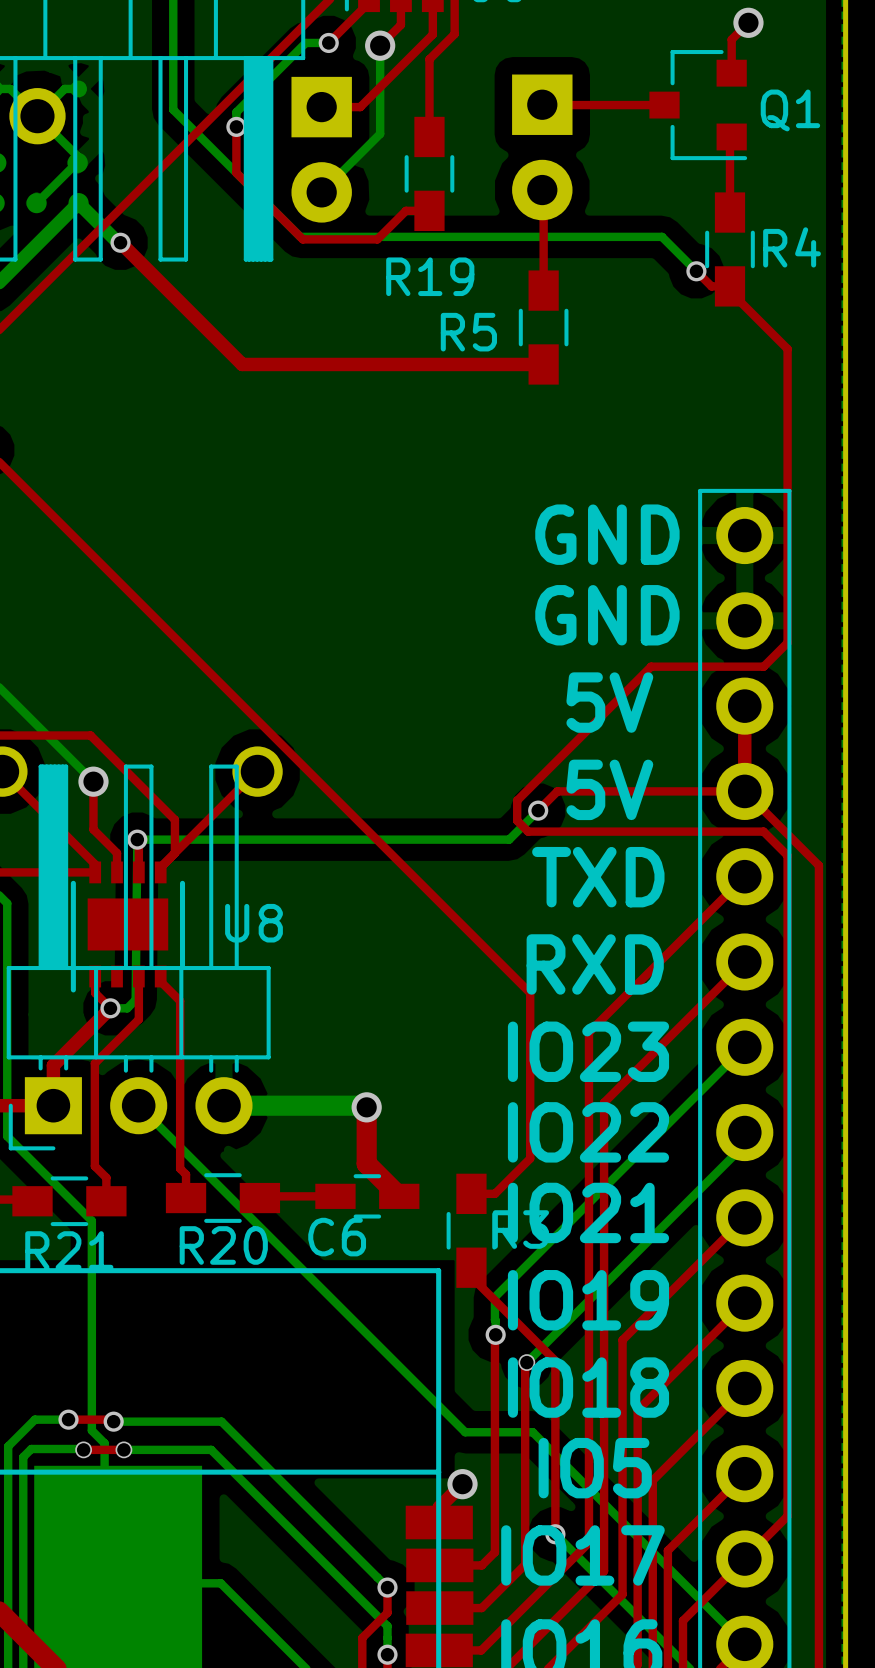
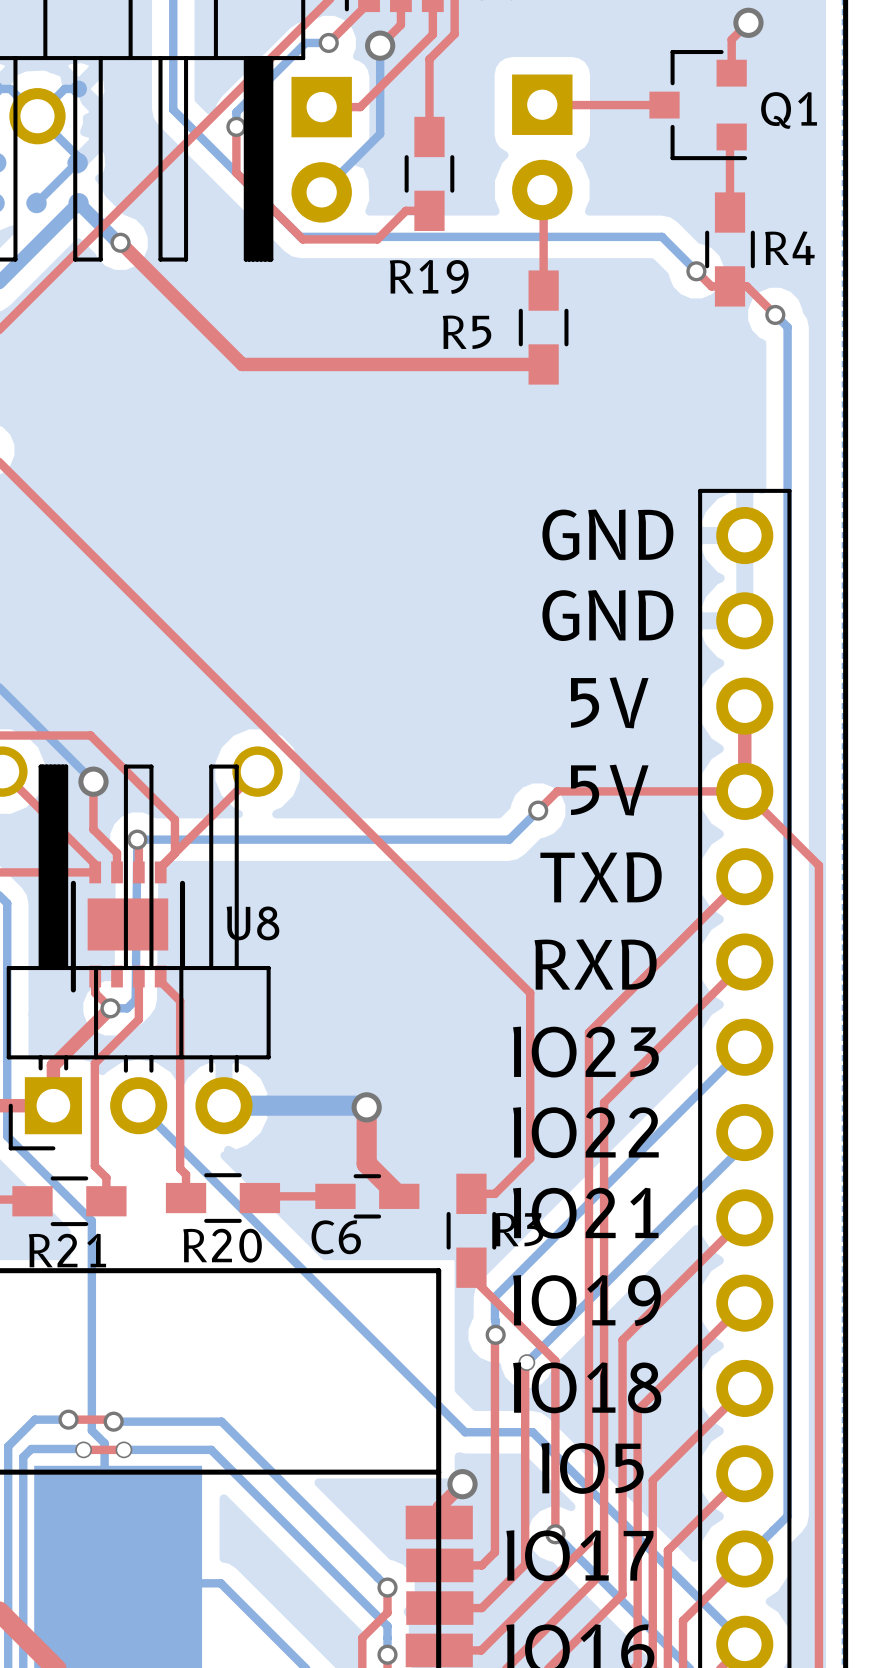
top track: none -> (730, 286) (746, 286) (775, 314)
top track: (730, 291) (787, 349) (787, 642) (763, 666) (651, 666) (517, 800) (517, 820) (528, 831) (763, 831) (787, 855) (787, 1516) (744, 1559) -> none
bottom track: none -> (775, 314) (787, 327) (787, 1516) (744, 1559)
via: none -> (775, 314)

